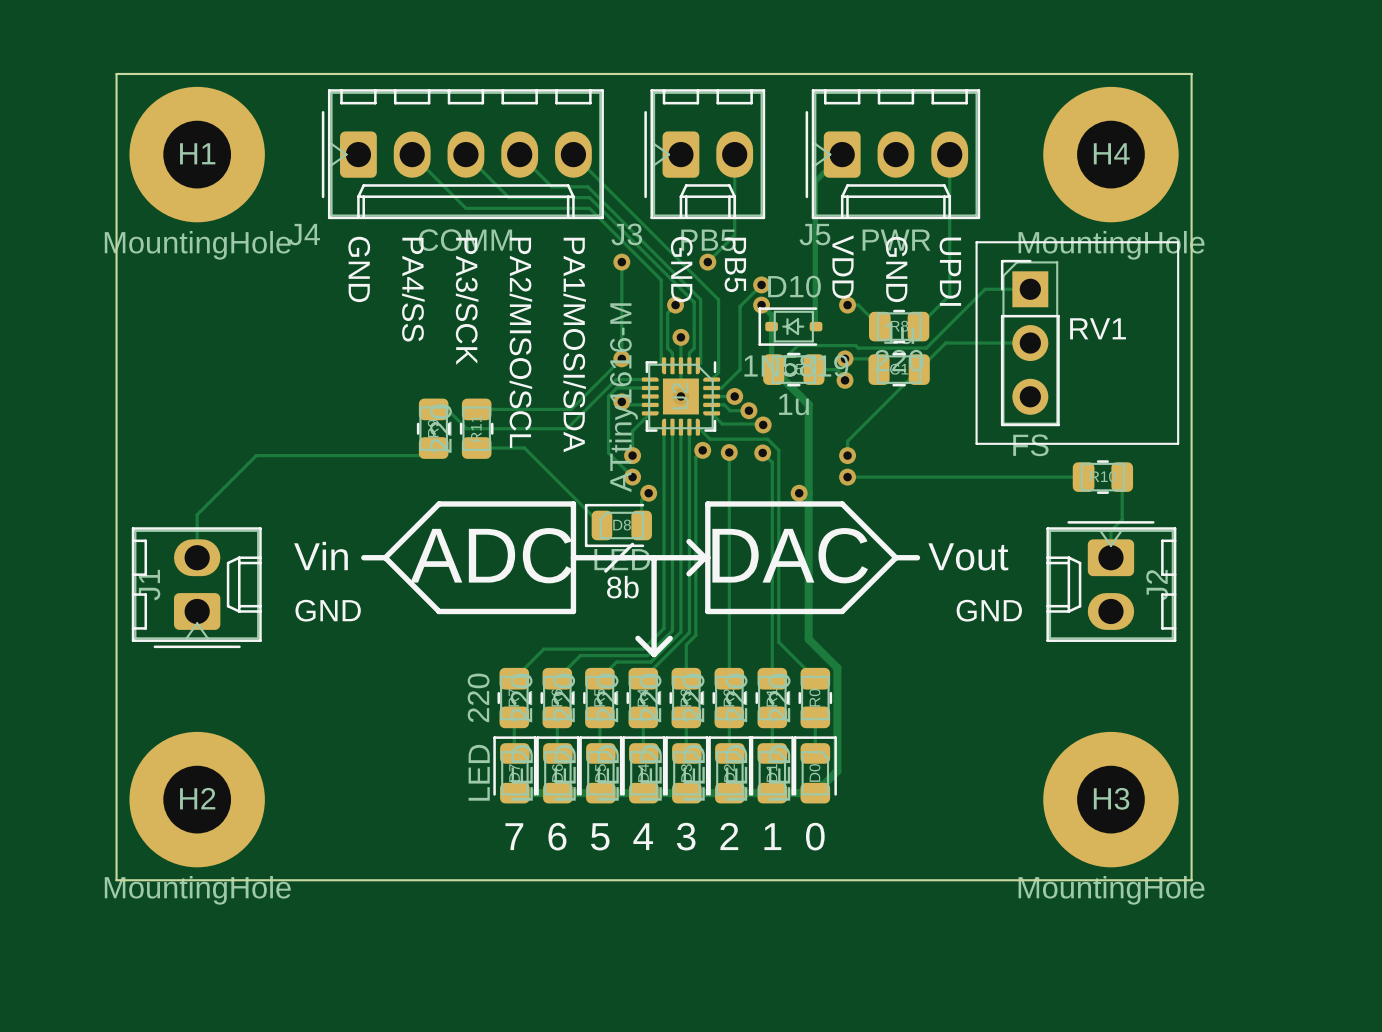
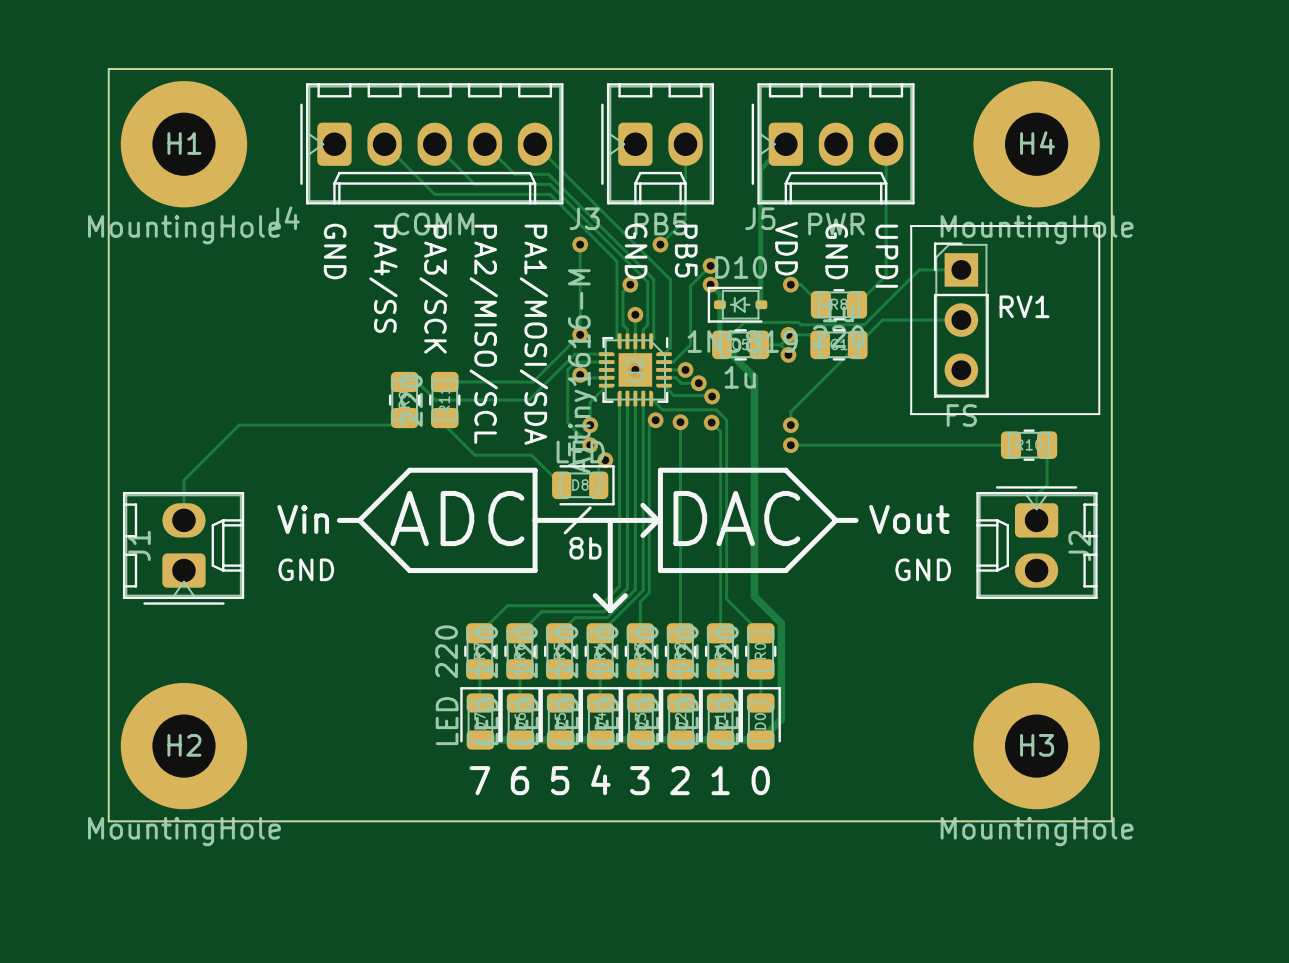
track: (476, 448) (524, 448) (601, 525) -> (444, 418) (444, 425) (474, 455) (531, 455) (561, 485)
via: (799, 493) -> none
D8 rotation: 0° (618, 525) -> 180° (583, 485)

